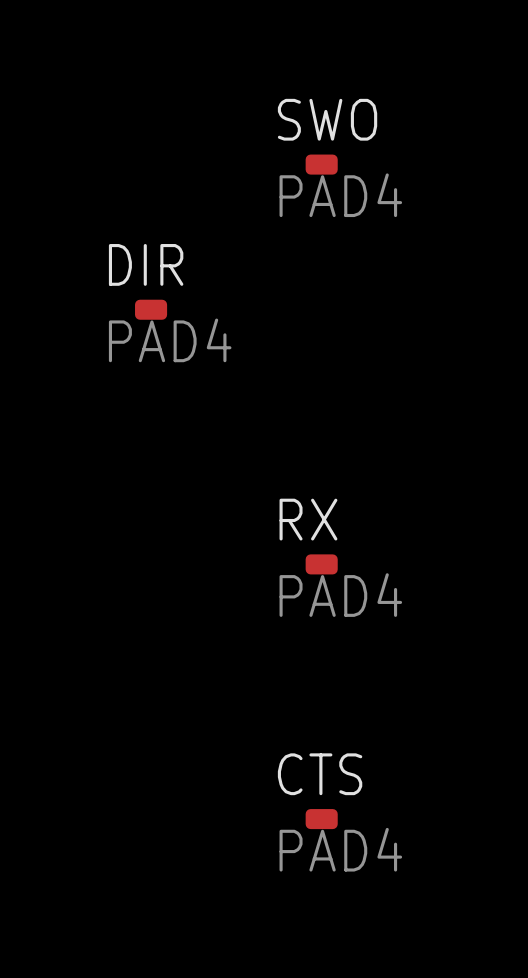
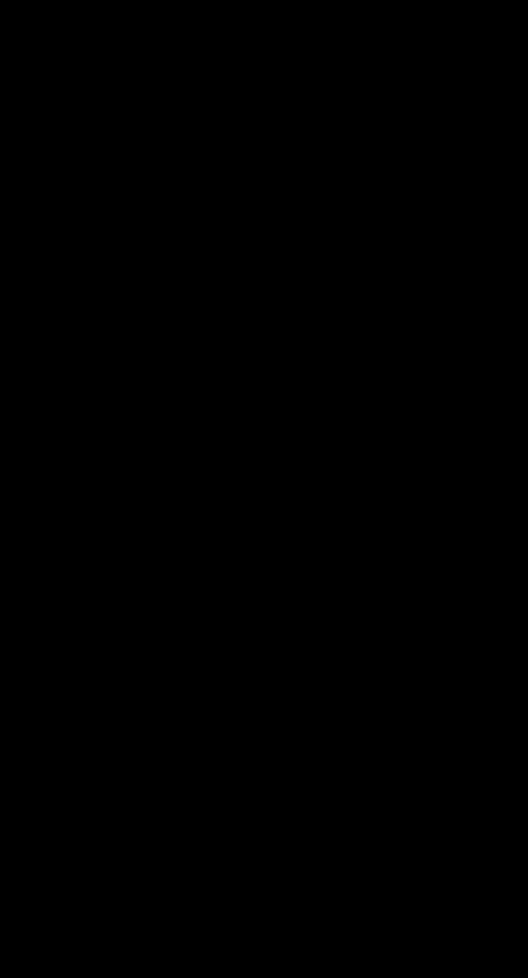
SWO: PAD4 (321, 164) -> none
DIR: PAD4 (151, 309) -> none
RX: PAD4 (321, 564) -> none
CTS: PAD4 (321, 819) -> none

